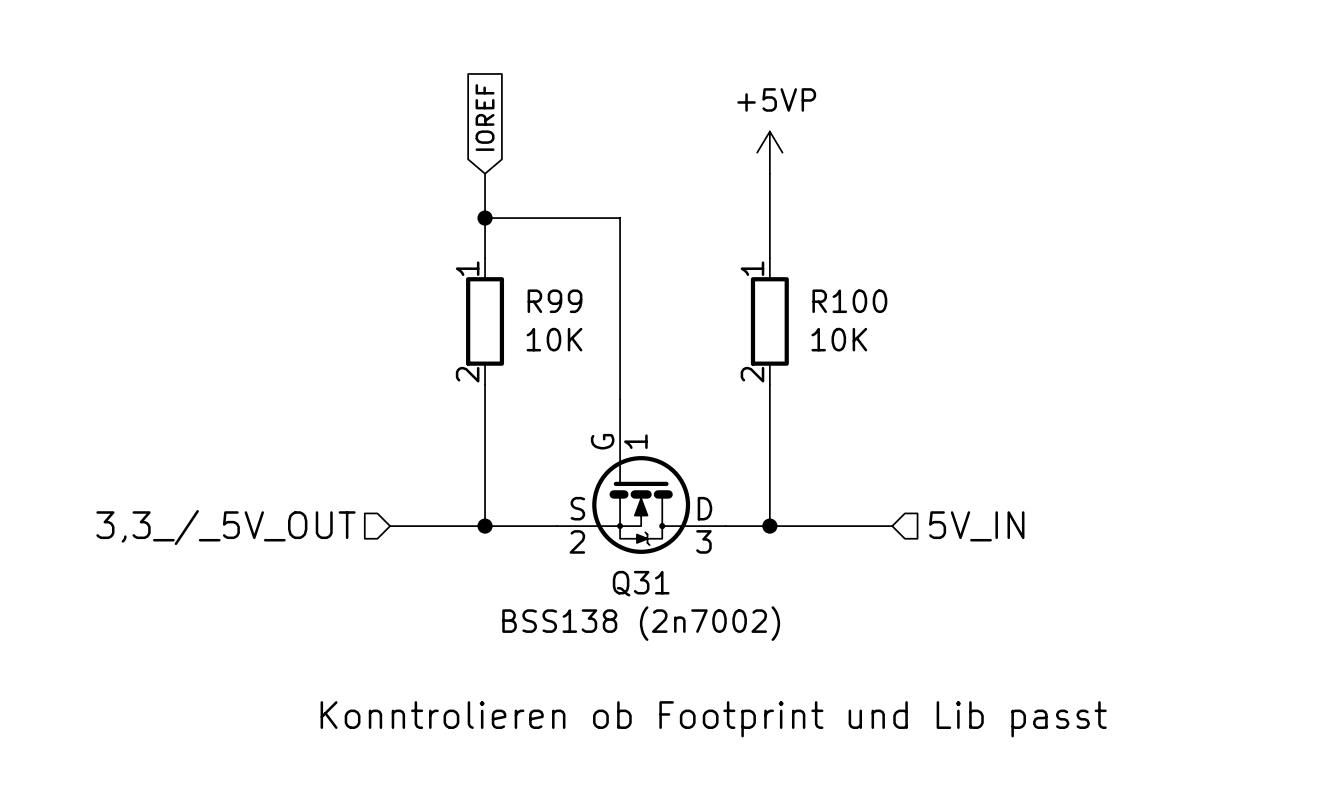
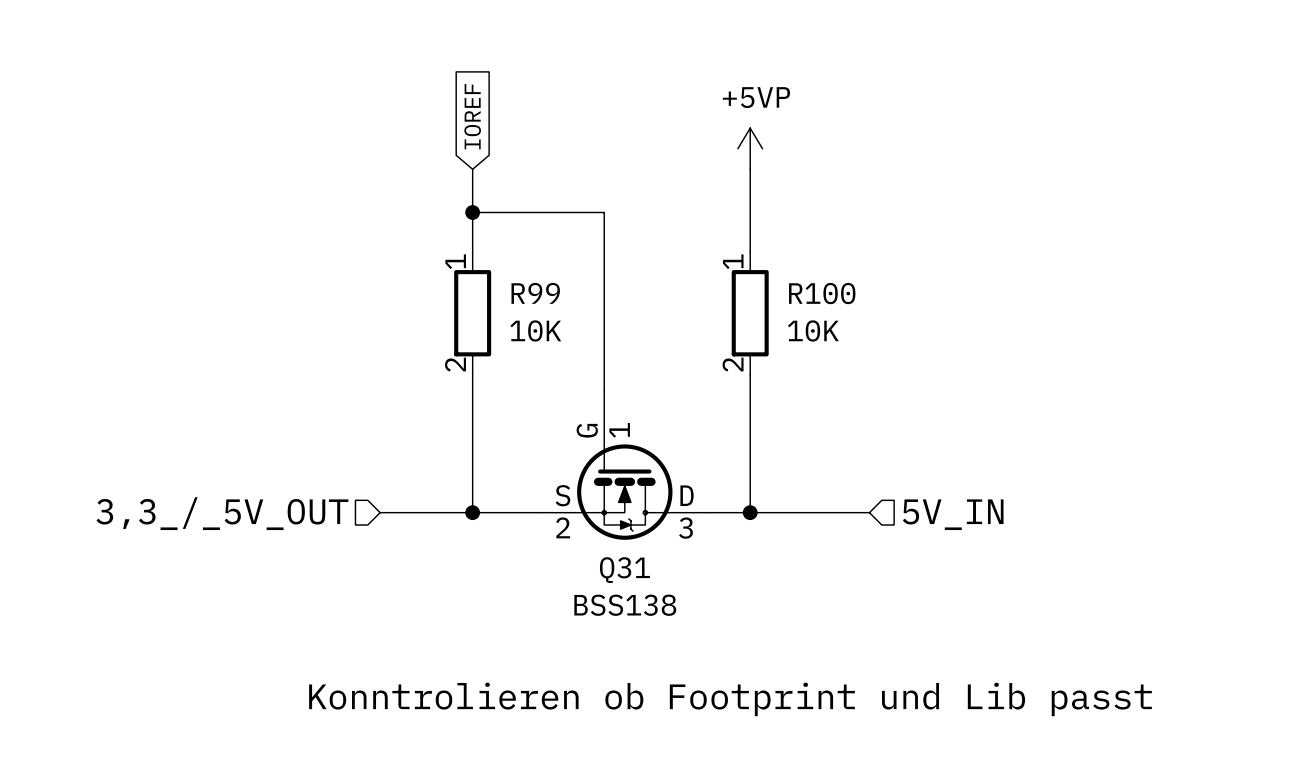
Q31 value: BSS138 (2n7002) (641, 623) -> BSS138 (625, 605)

